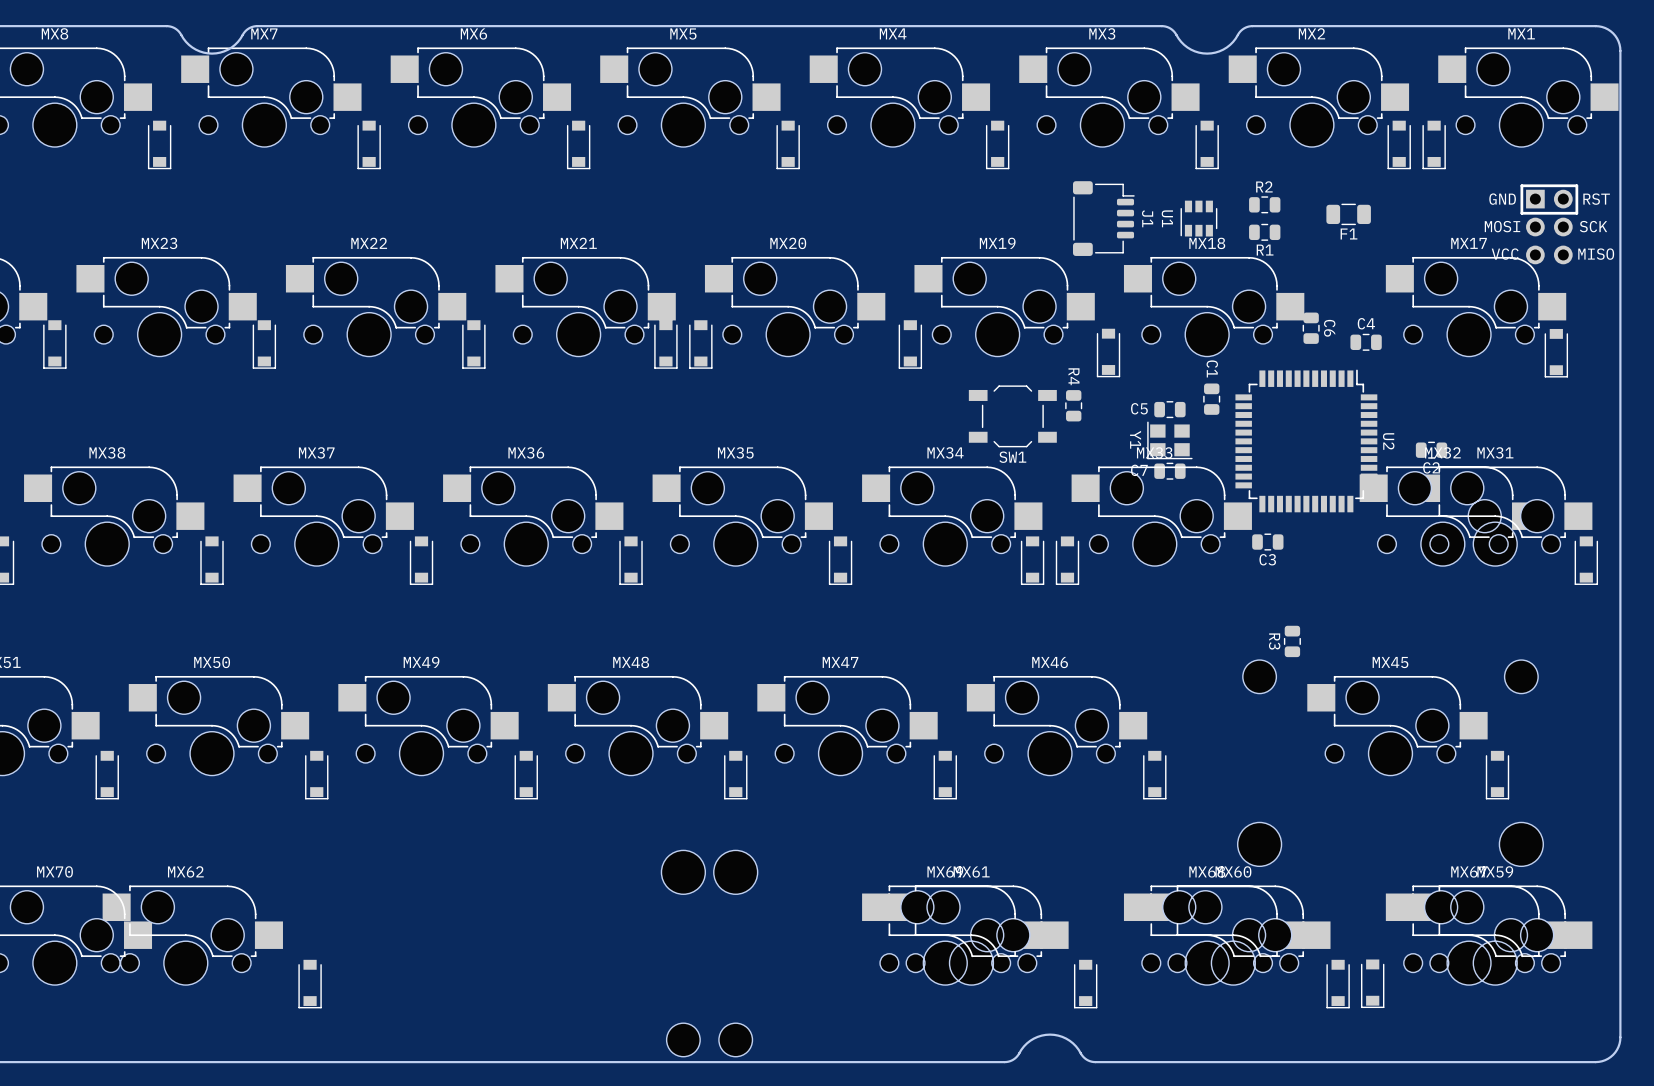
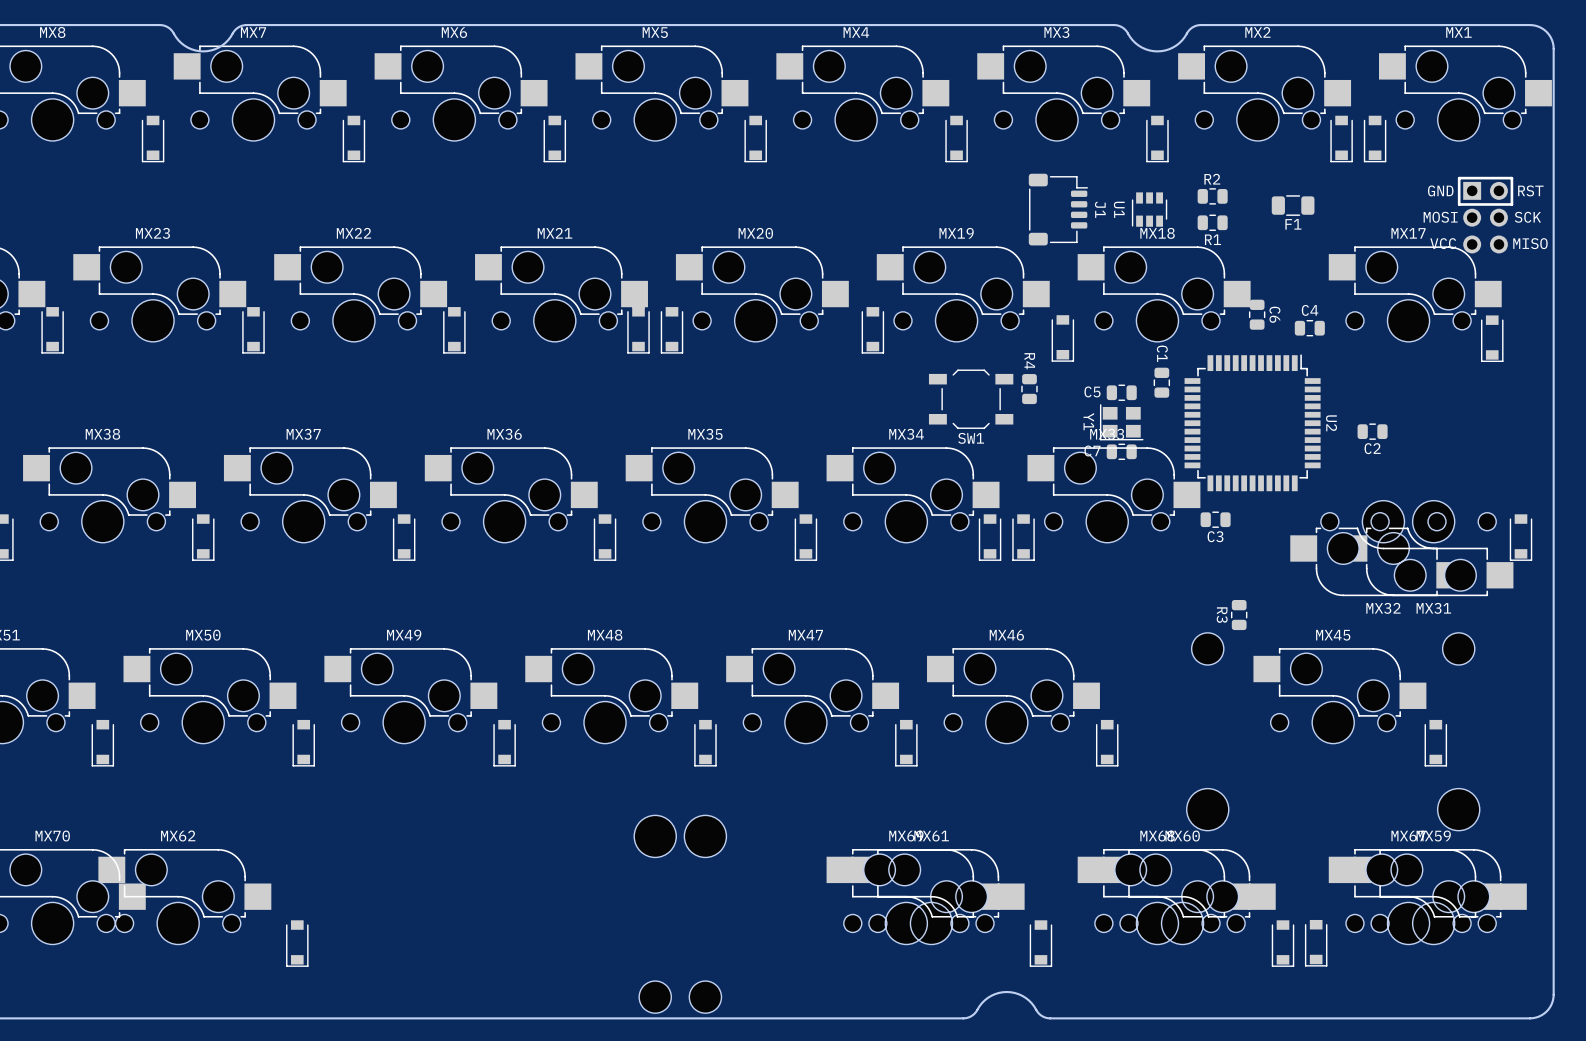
MX32 rotation: 0° (1449, 516) -> 180° (1376, 548)
MX31 rotation: 0° (1502, 516) -> 180° (1426, 548)

